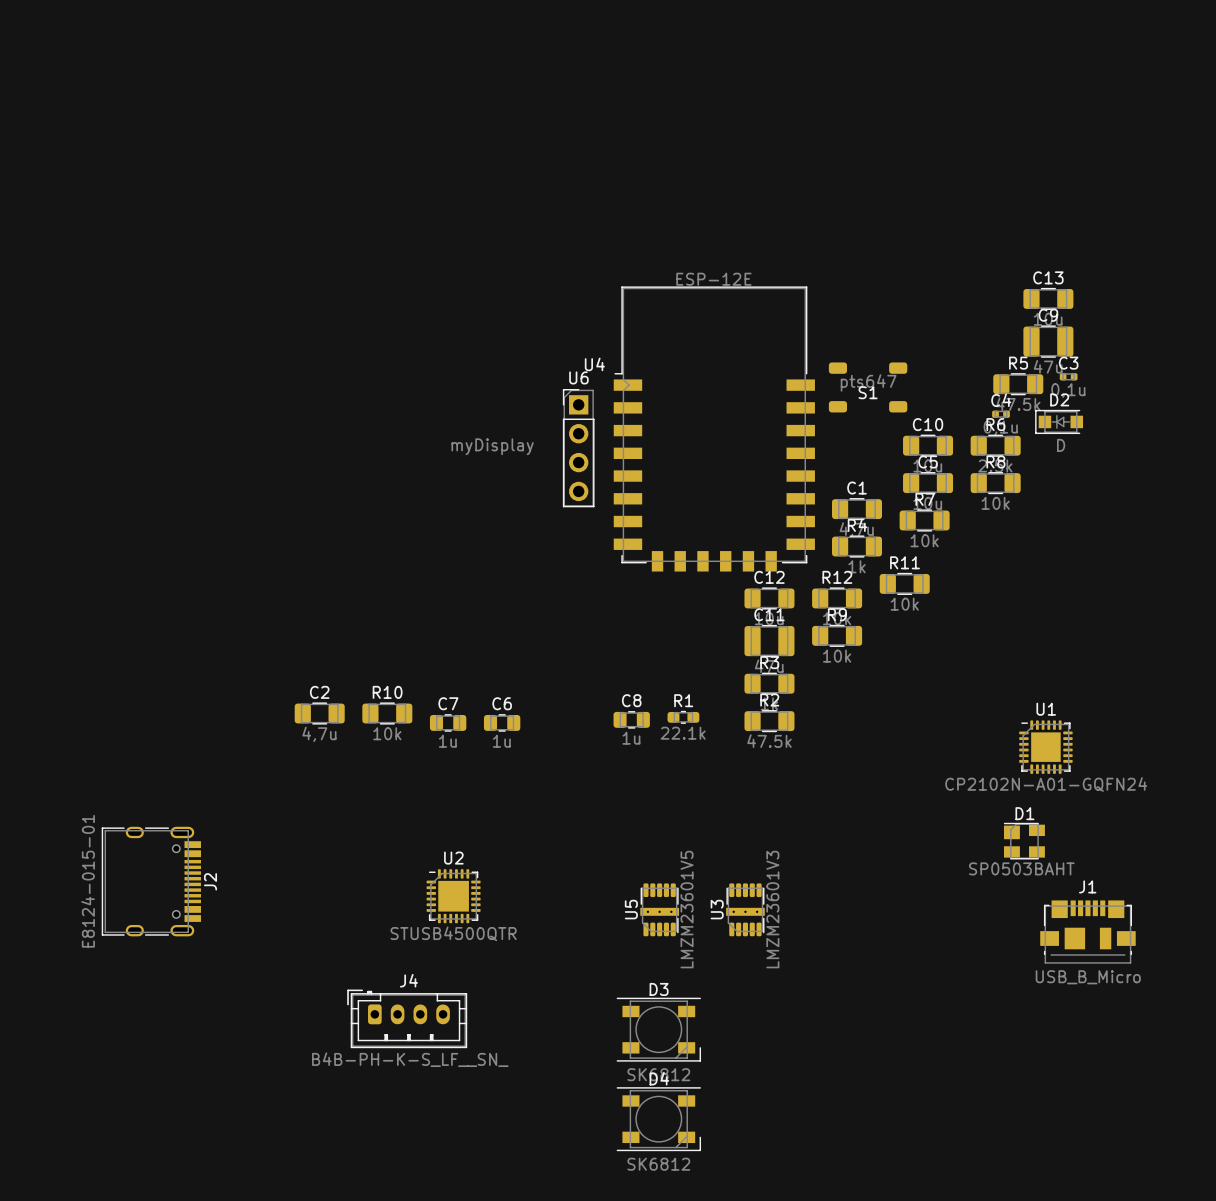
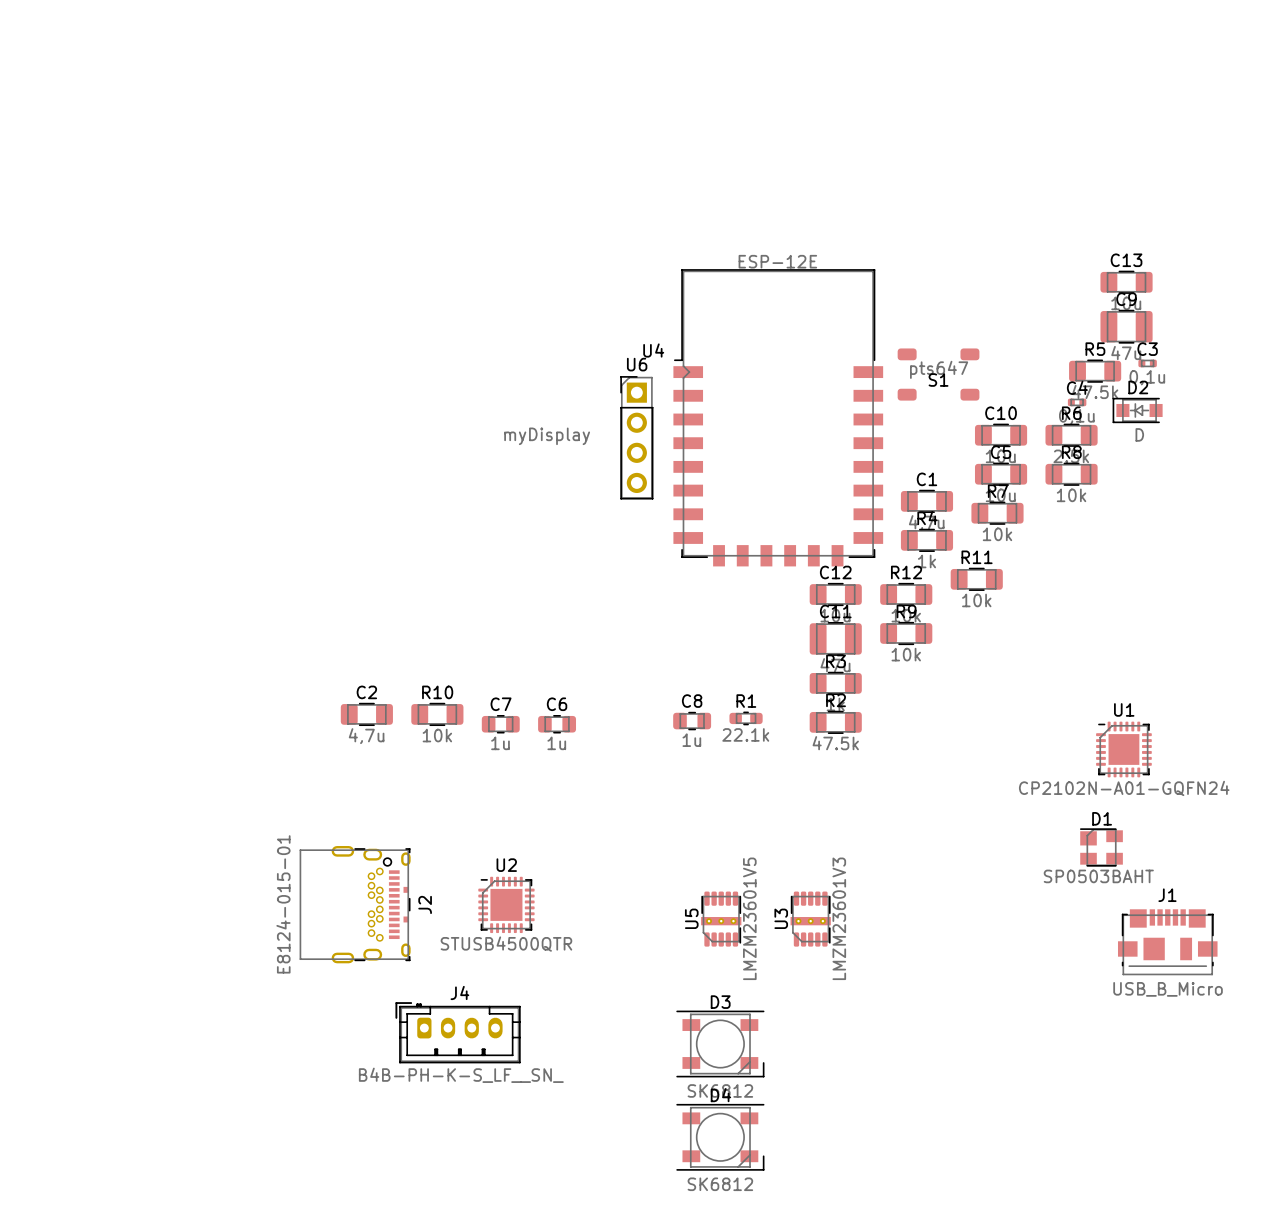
J2 footprint: [101, 826, 201, 937] -> [299, 846, 411, 964]

